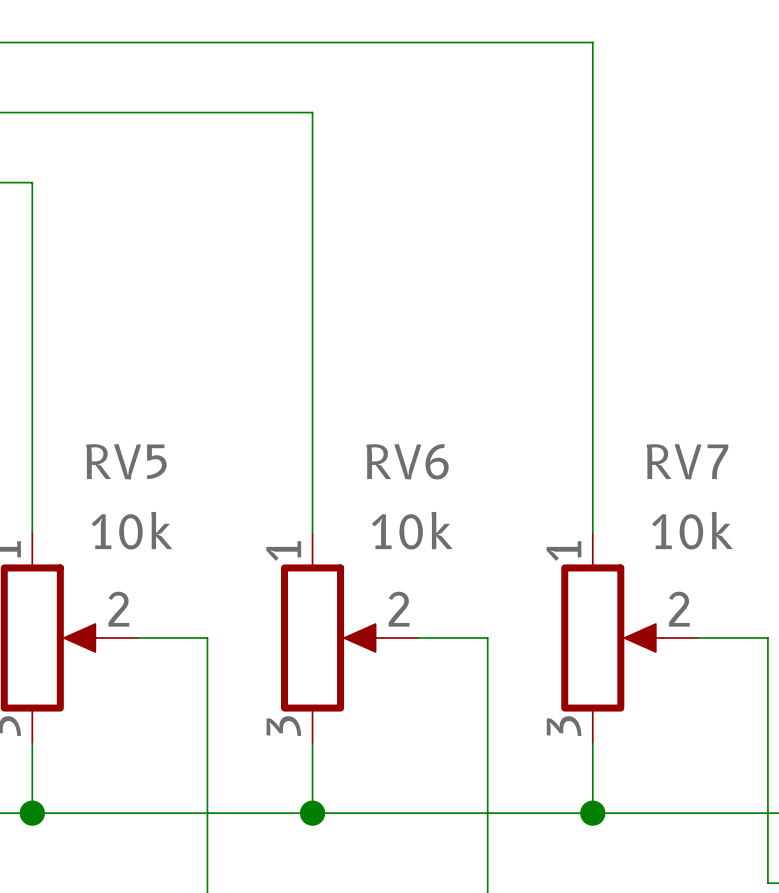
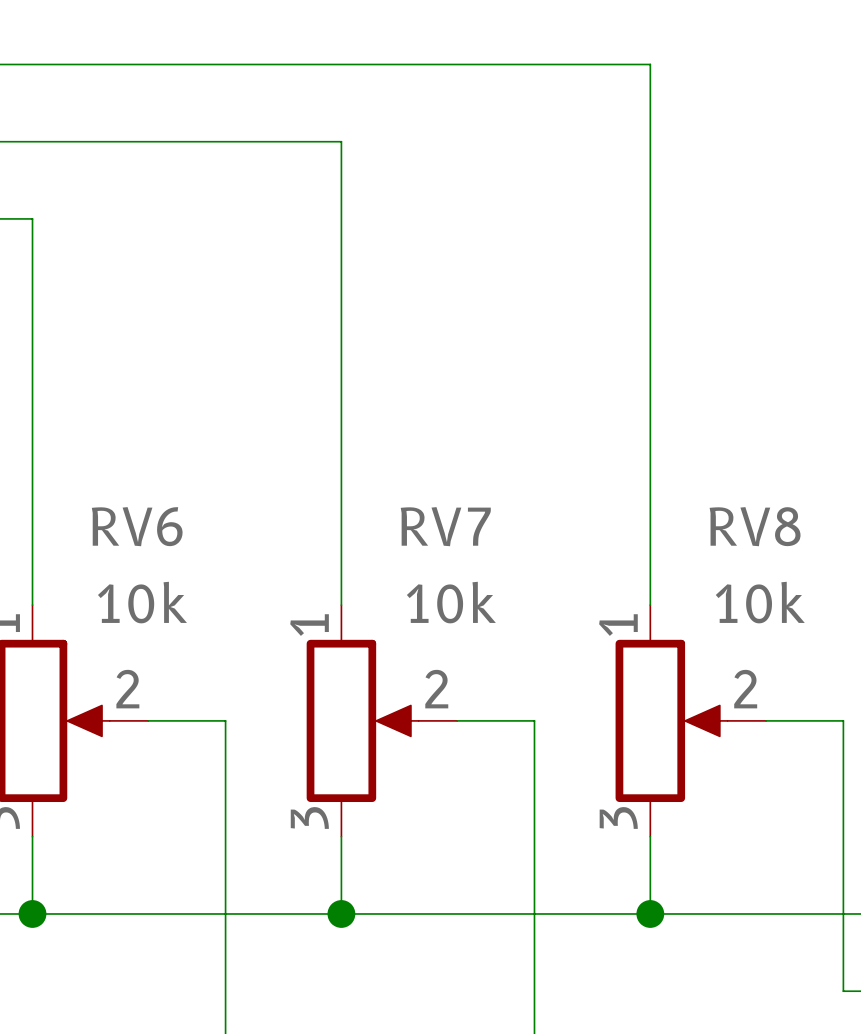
RV5 name: RV5 (126, 461) -> RV6 (137, 526)
RV6 name: RV6 (407, 461) -> RV7 (445, 526)
RV7 name: RV7 (687, 461) -> RV8 (755, 526)

